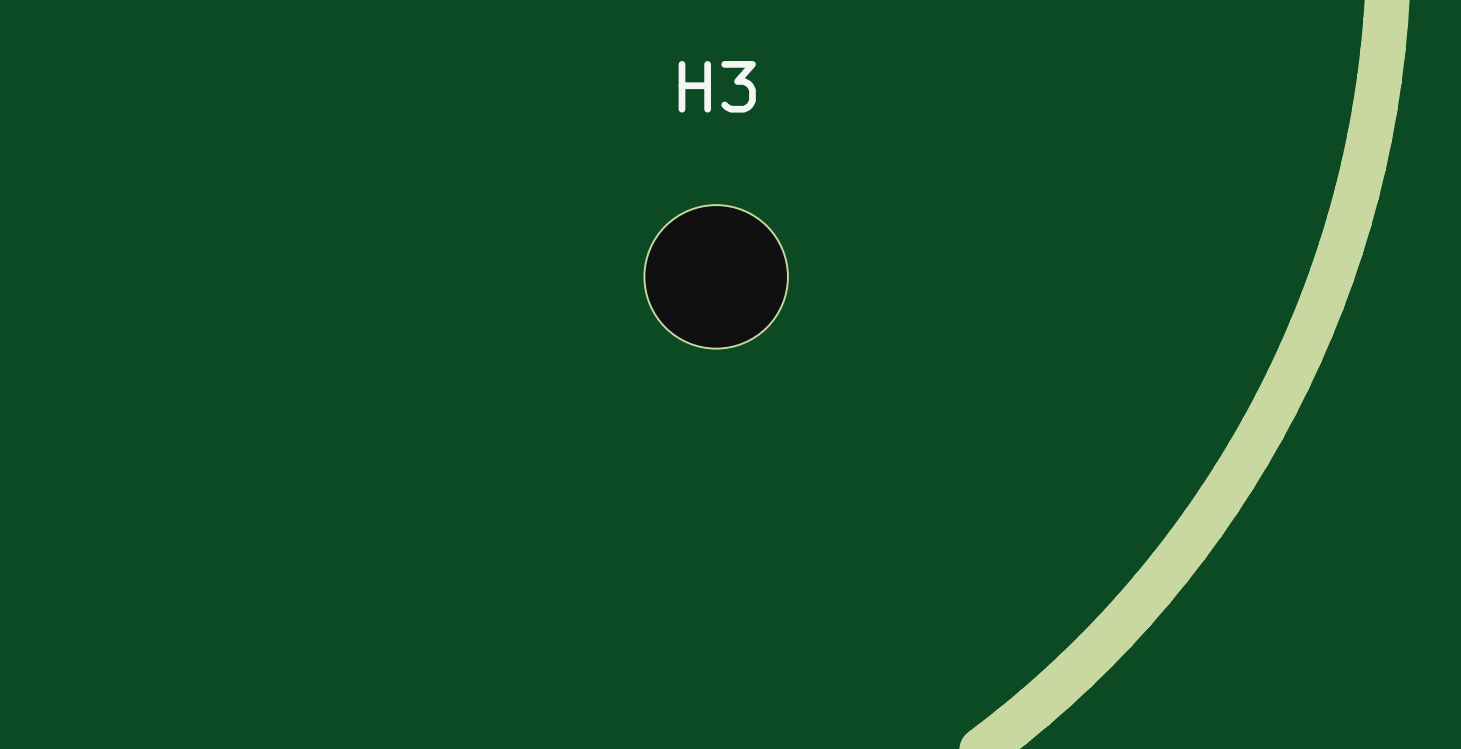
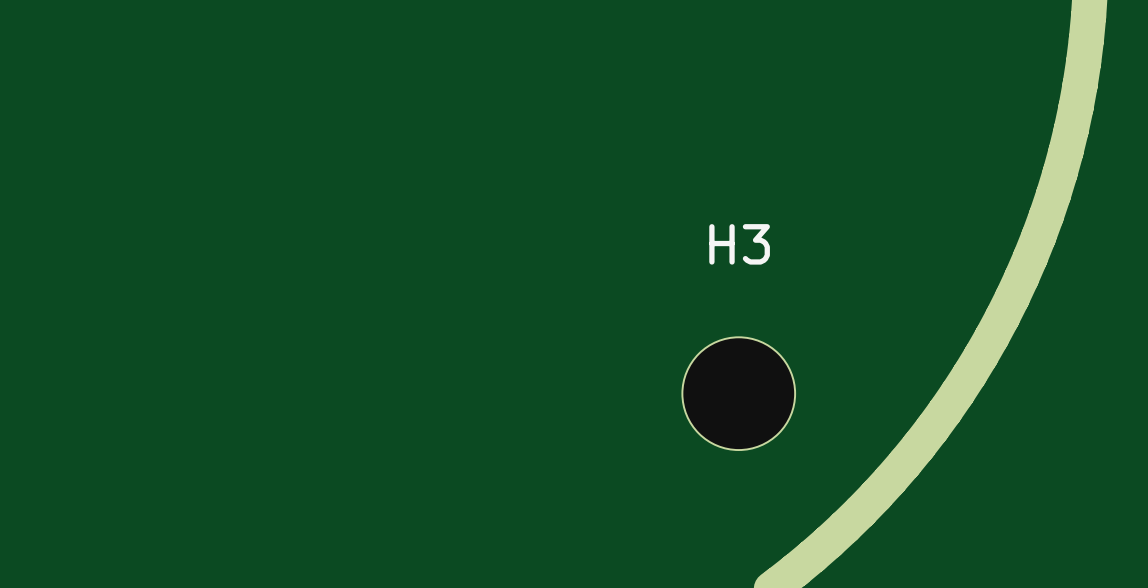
H3 position: (716, 276) -> (738, 393)

